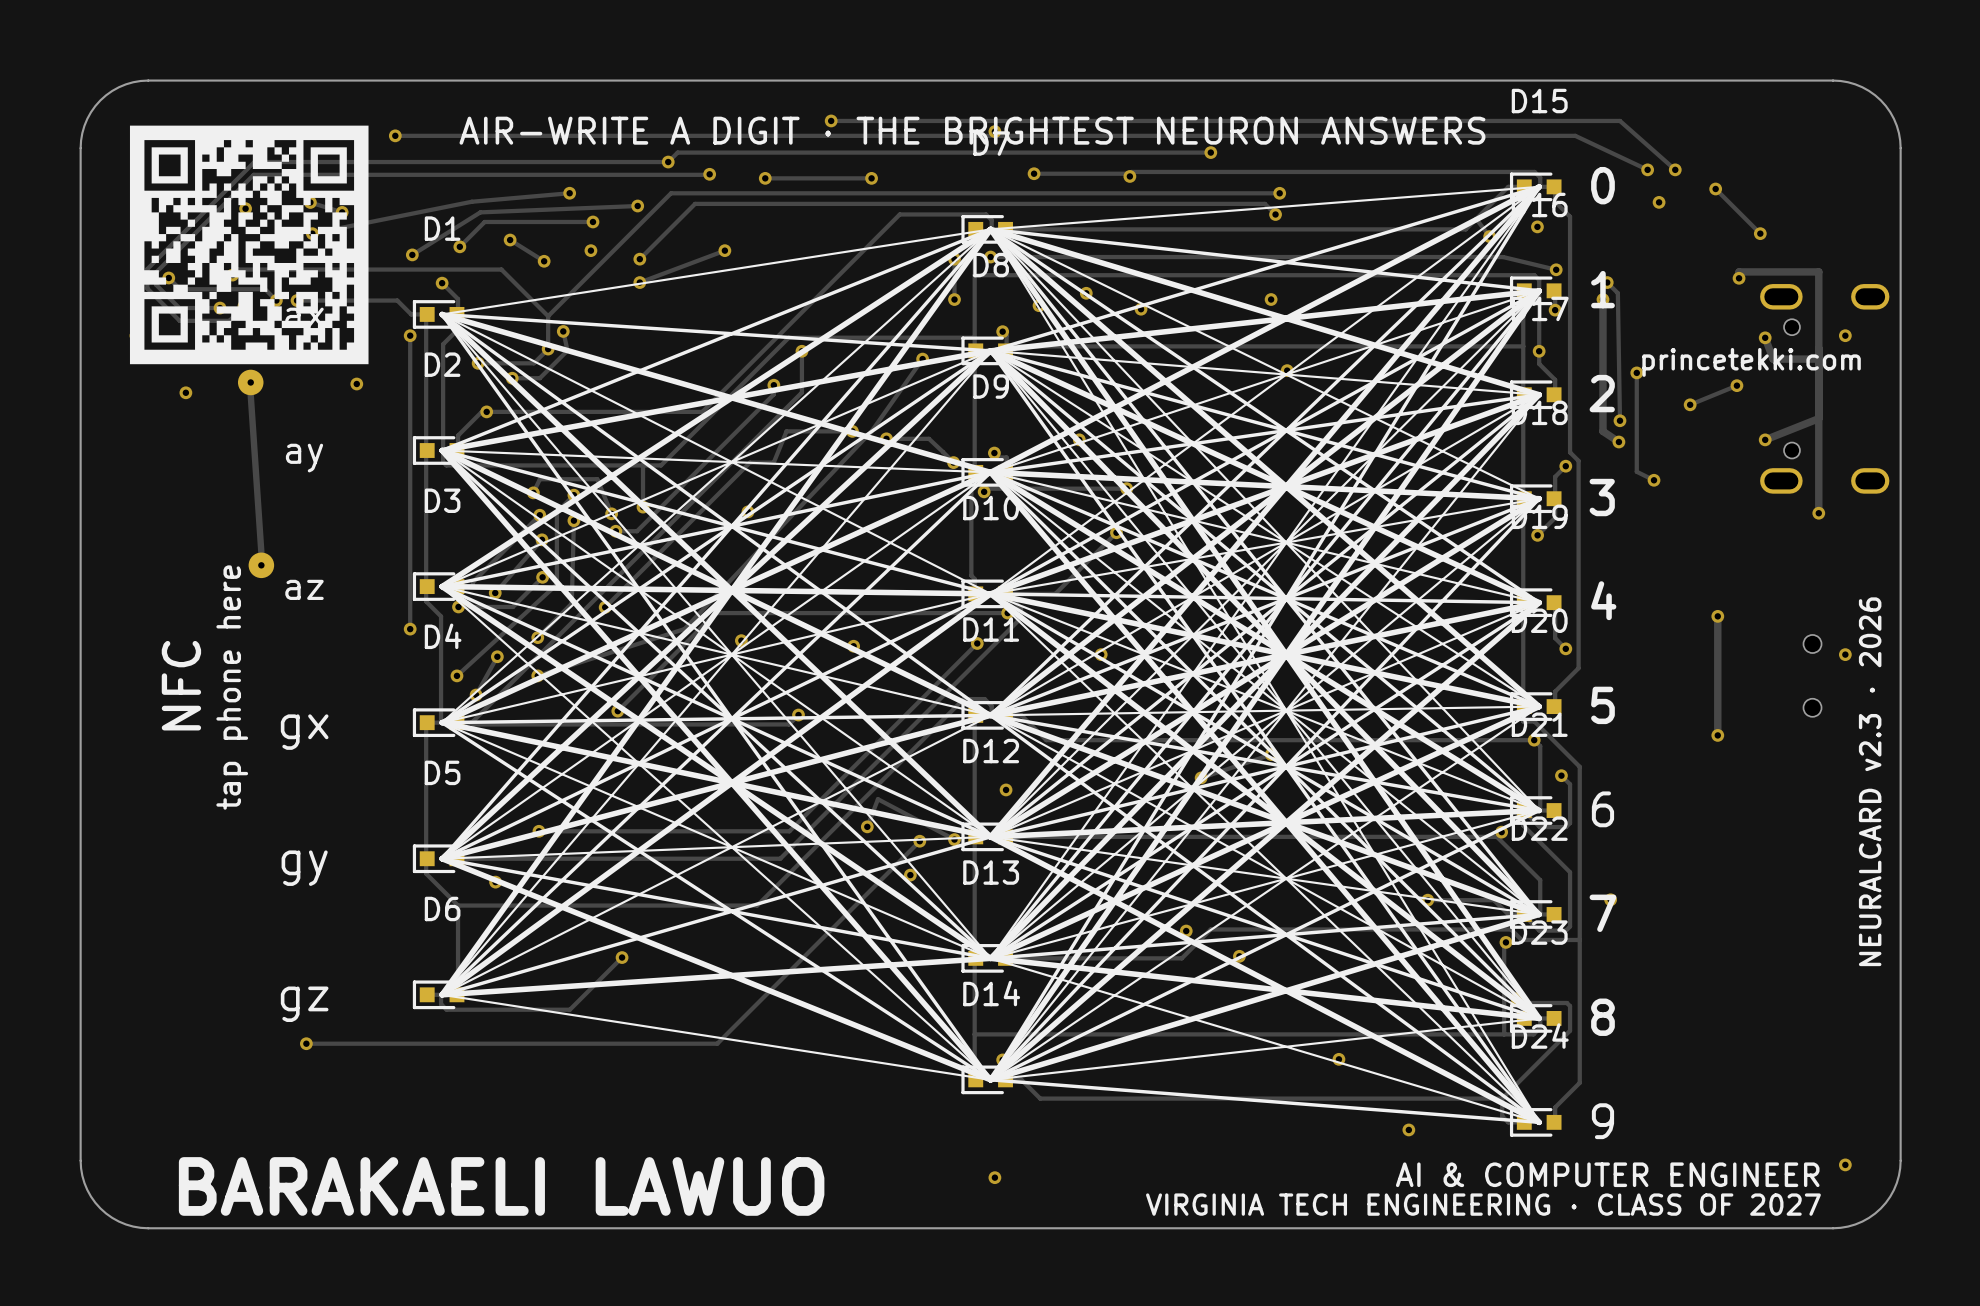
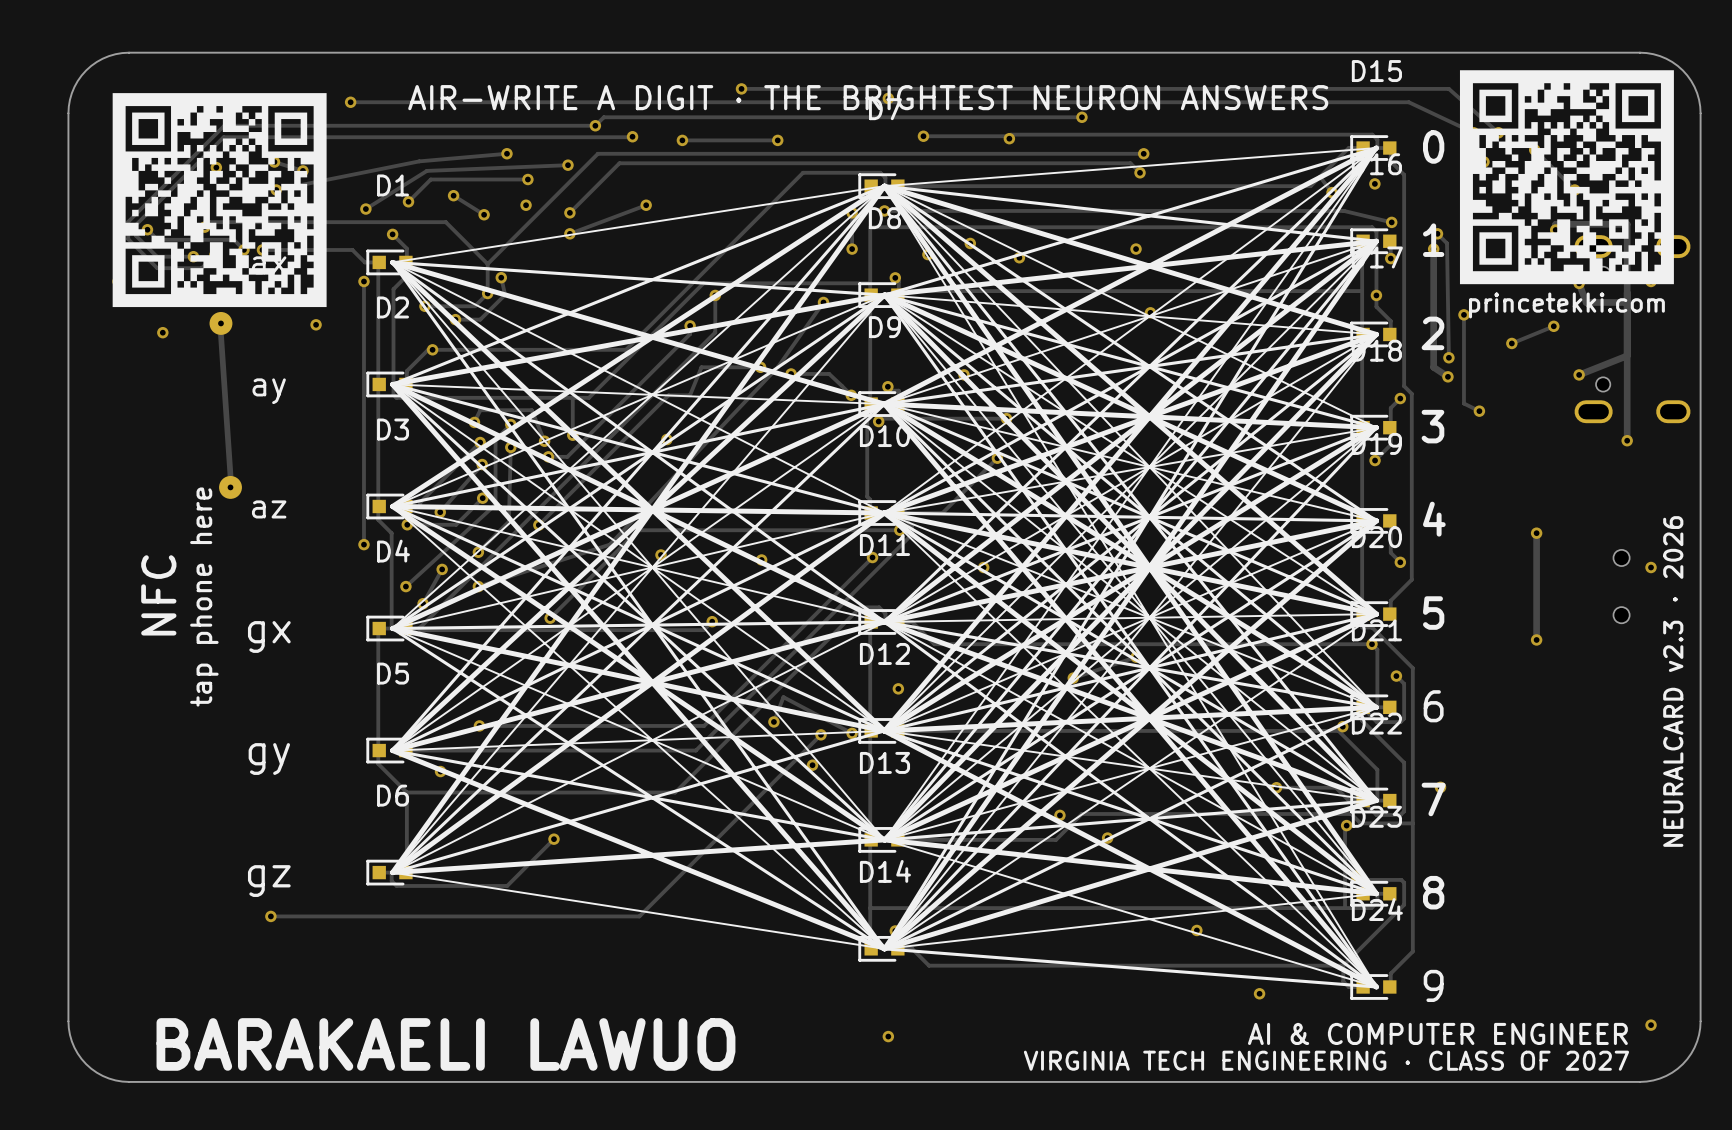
drawing: none -> [1459, 70, 1674, 285]

